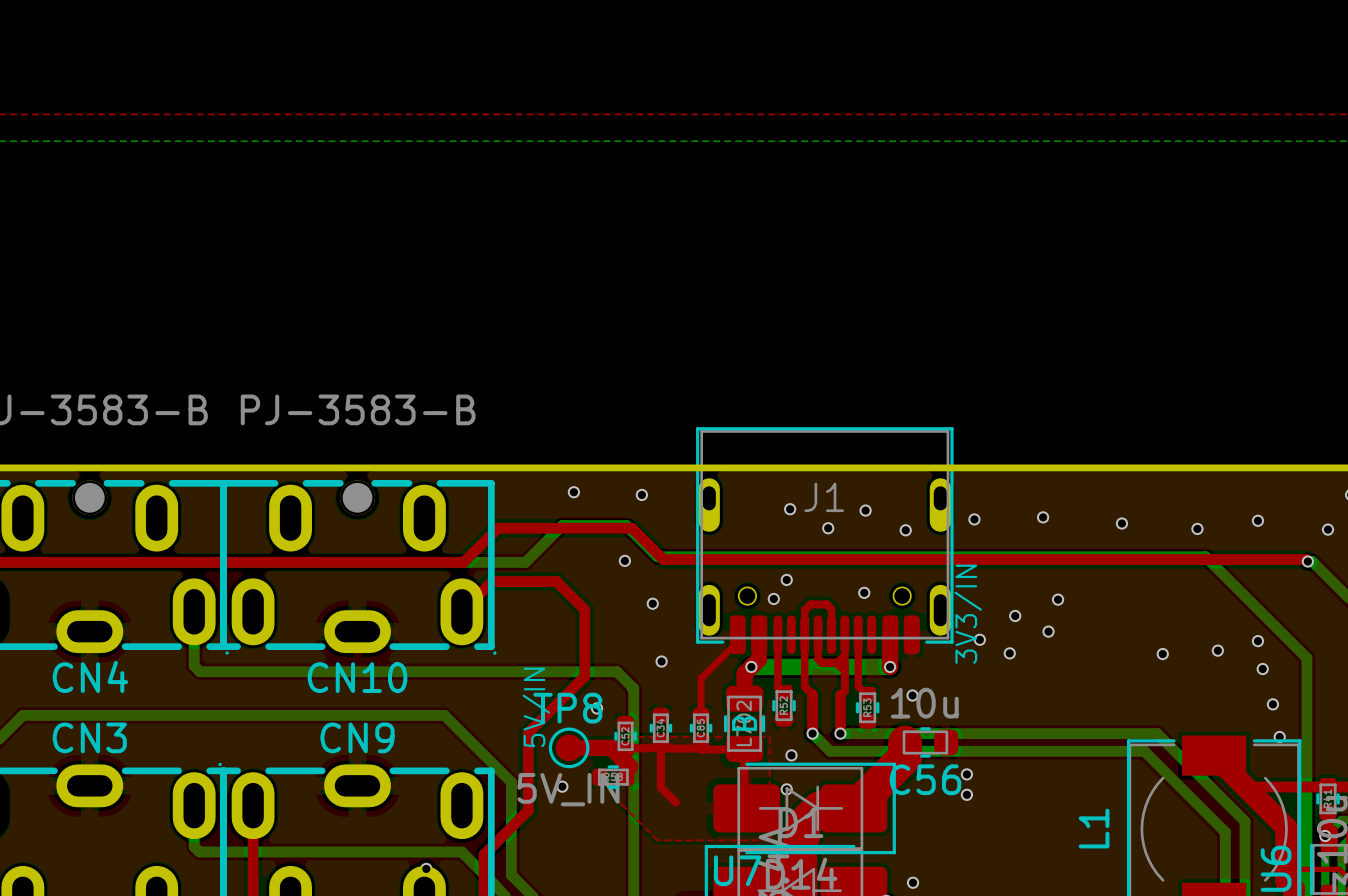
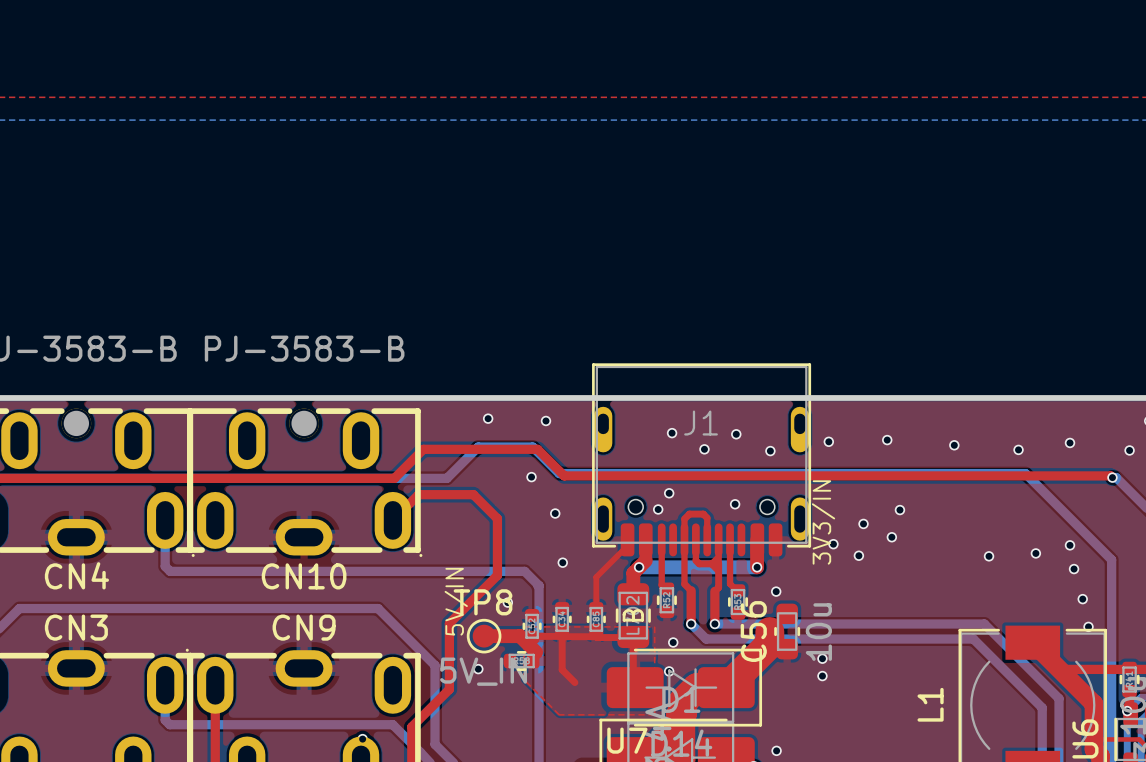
C56 rotation: 0° (925, 742) -> 90° clockwise (787, 631)

